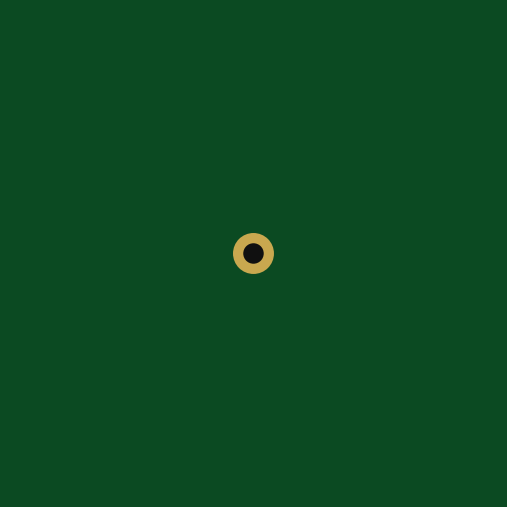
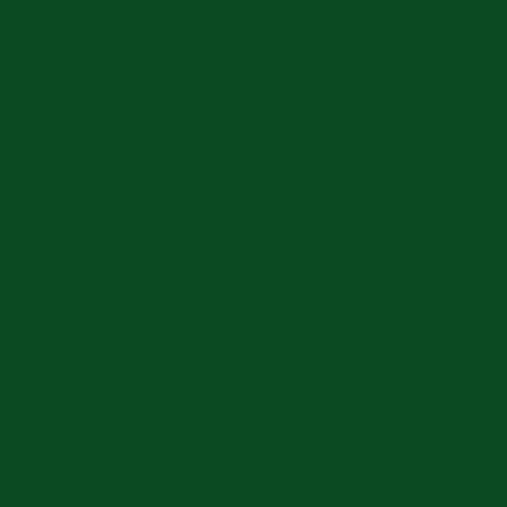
via: (253, 253) -> none

